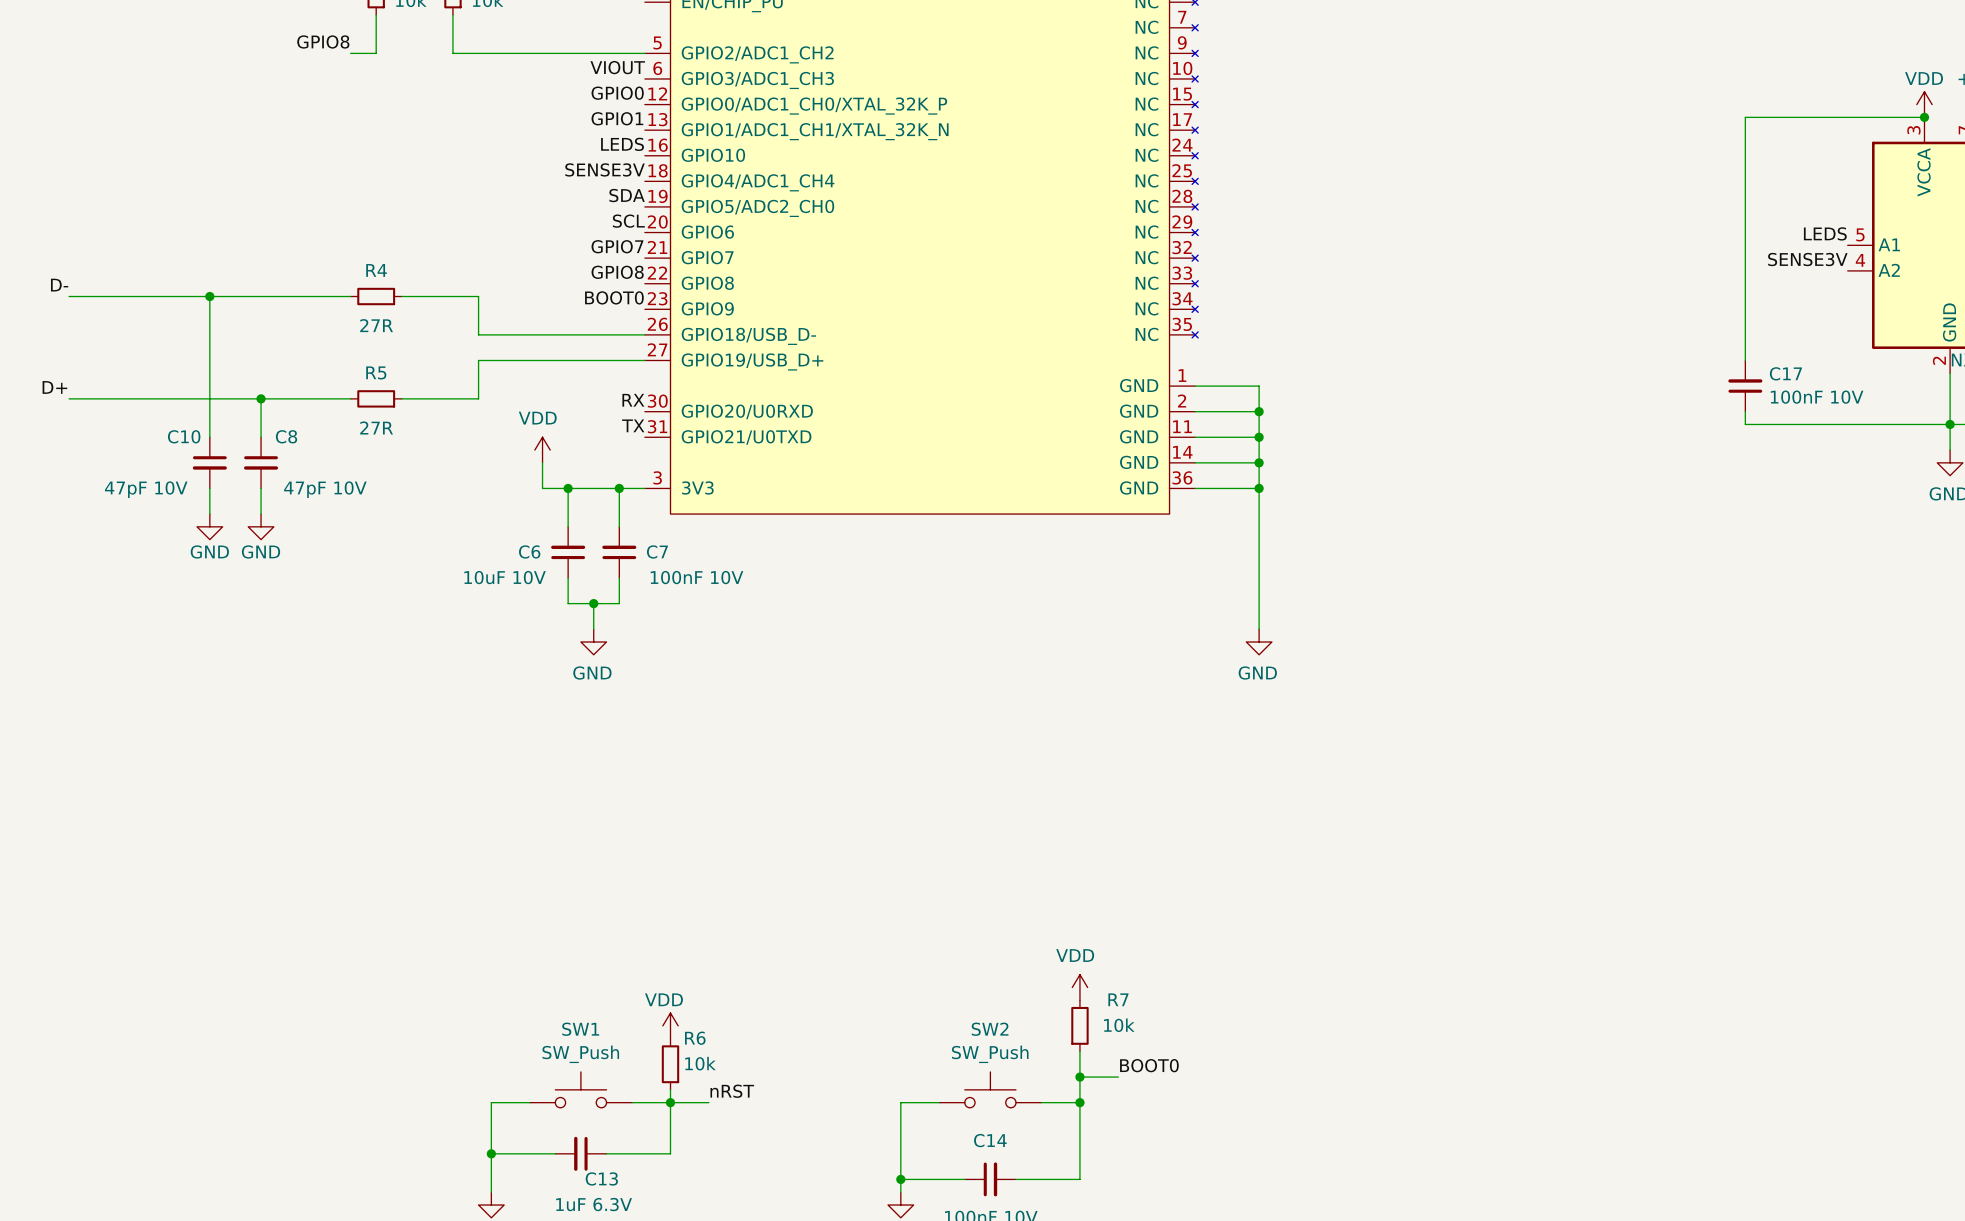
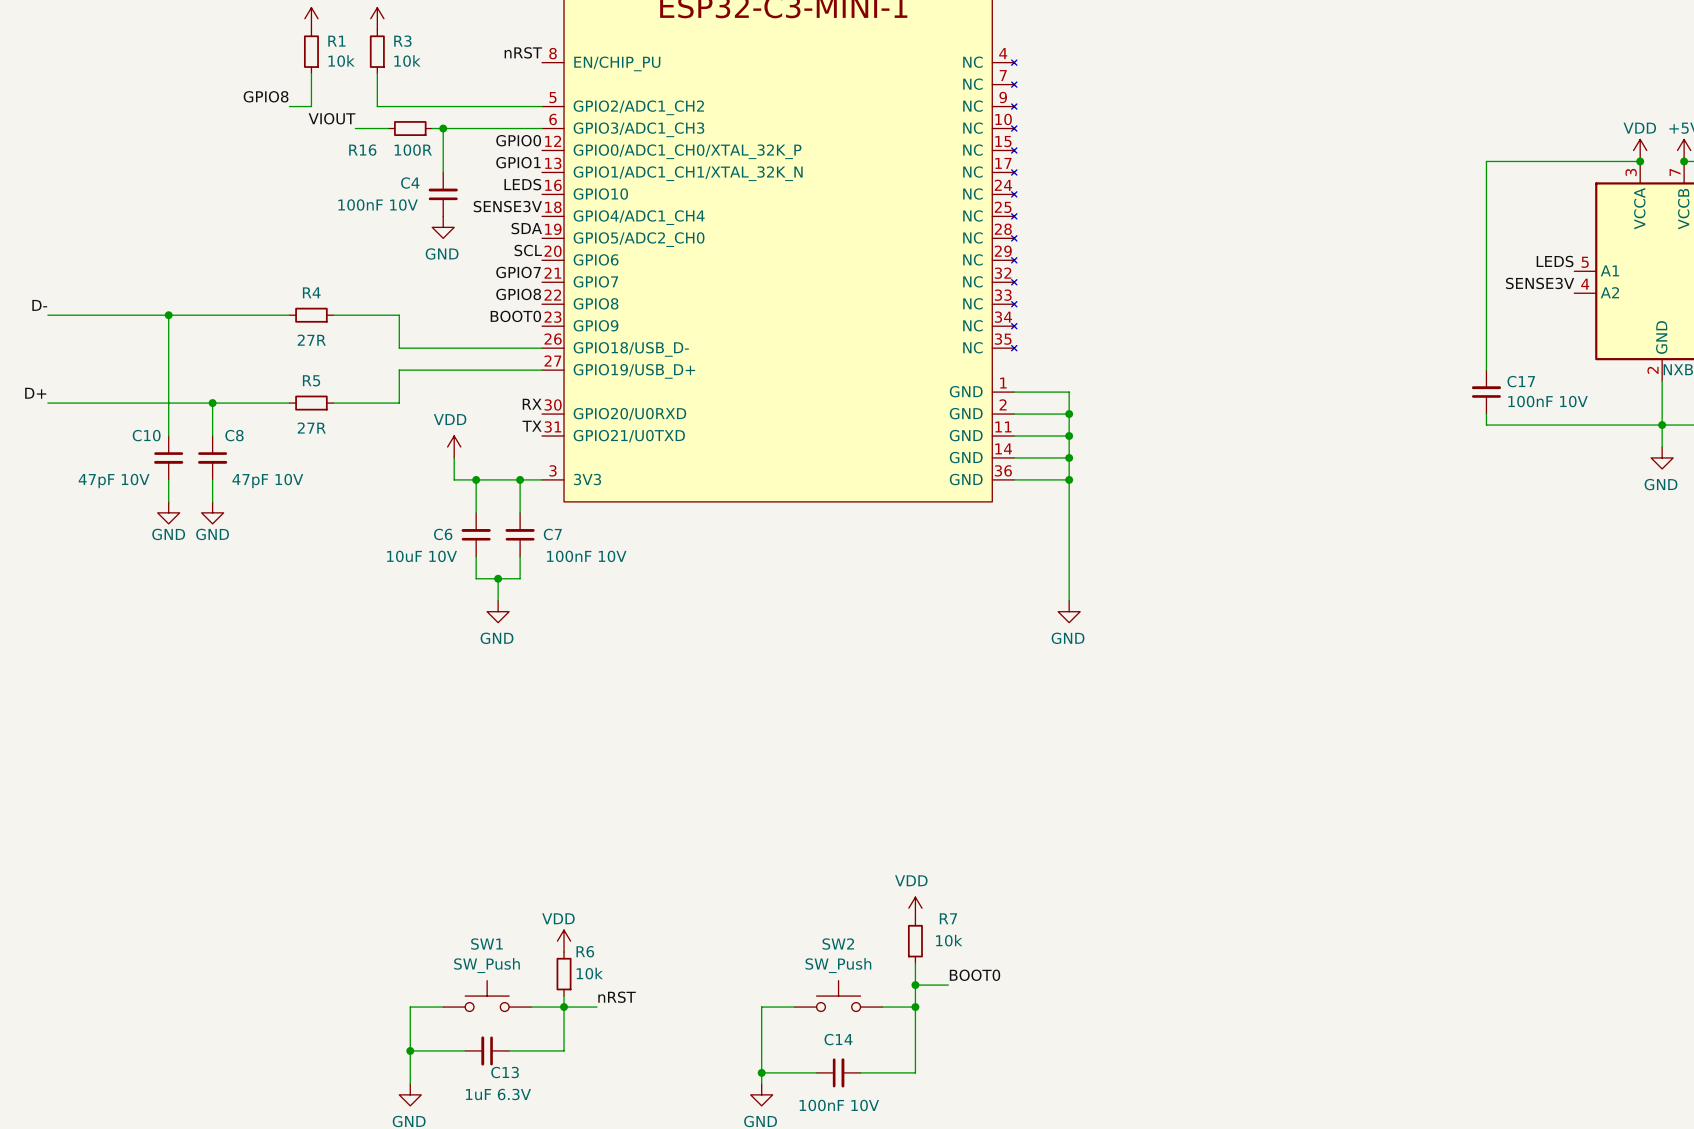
label position: VIOUT (617, 67) -> VIOUT (332, 118)
wire: none -> (355, 128) (388, 128)
R16: none -> 100R (410, 128)
wire: none -> (432, 128) (542, 128)
wire: none -> (443, 128) (443, 172)
junction: none -> (443, 128)
C4: none -> 100nF 10V (443, 194)
power symbol: none -> GND (443, 227)

